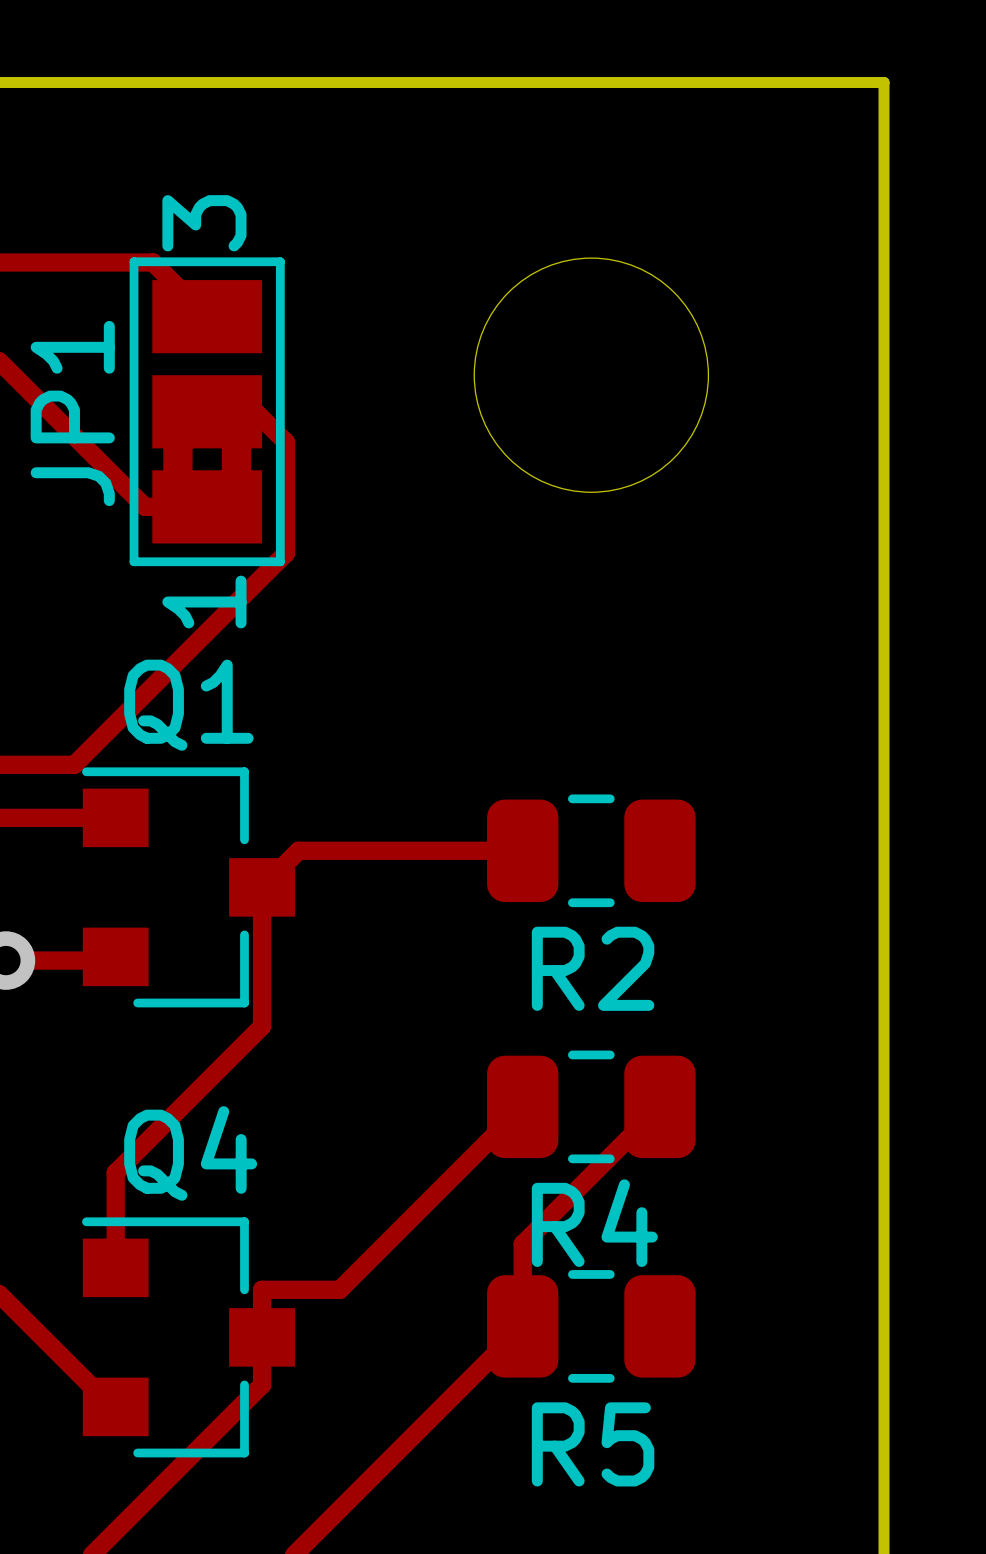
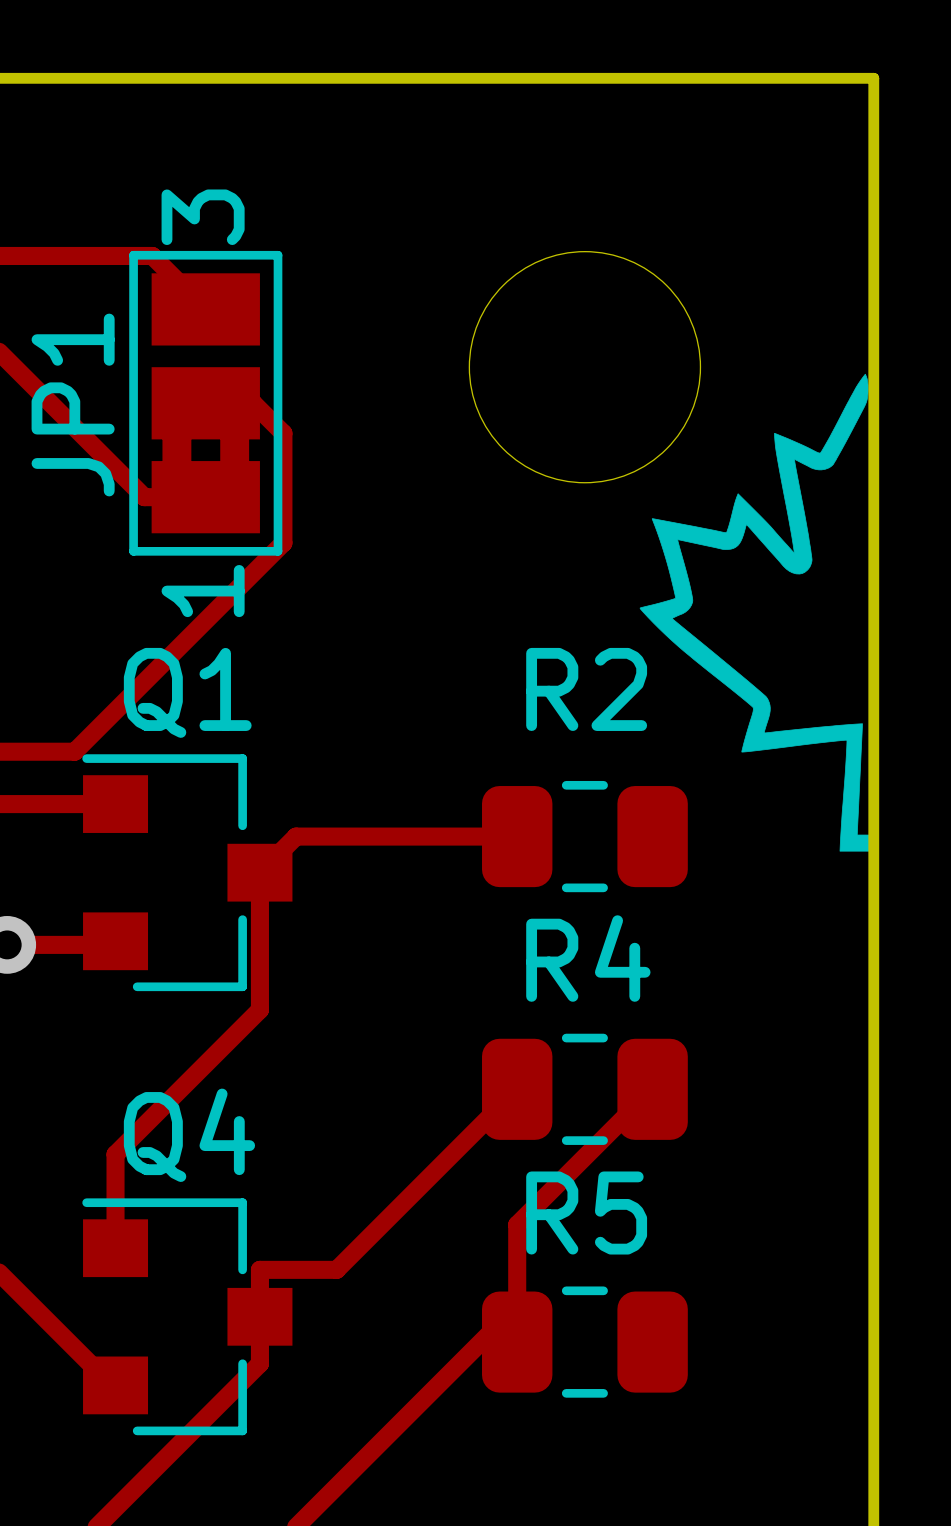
drawing: none -> [639, 373, 877, 852]
R2 name position: R2 (593, 968) -> R2 (586, 689)
R4 name position: R4 (594, 1223) -> R4 (588, 958)
R5 position: (591, 1326) -> (584, 1342)
R5 name position: R5 (593, 1444) -> R5 (586, 1213)

